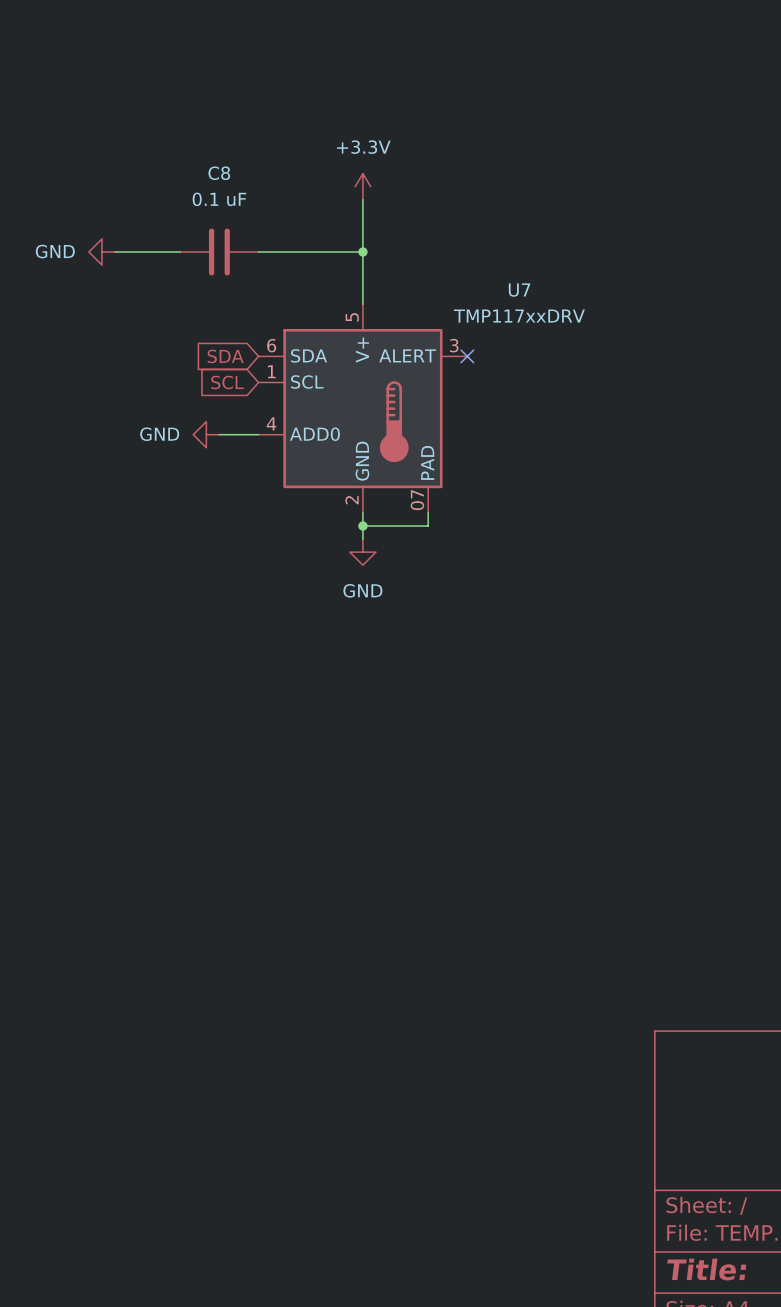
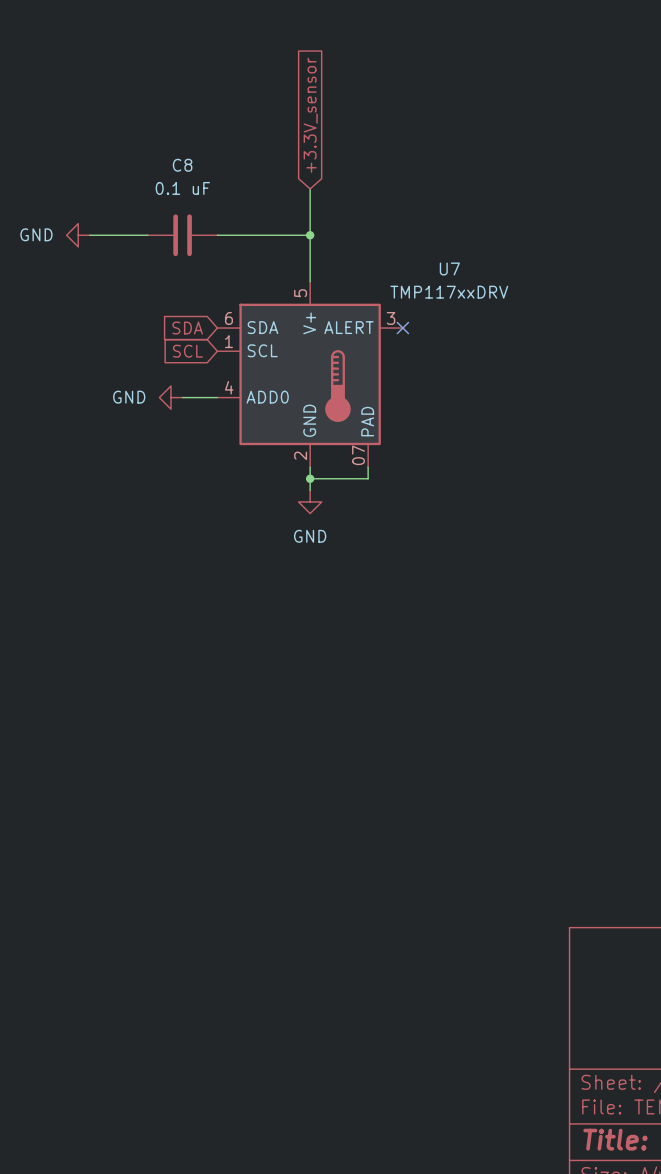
global label: none -> +3.3V_sensor (310, 115)
power symbol: +3.3V (362, 186) -> none

